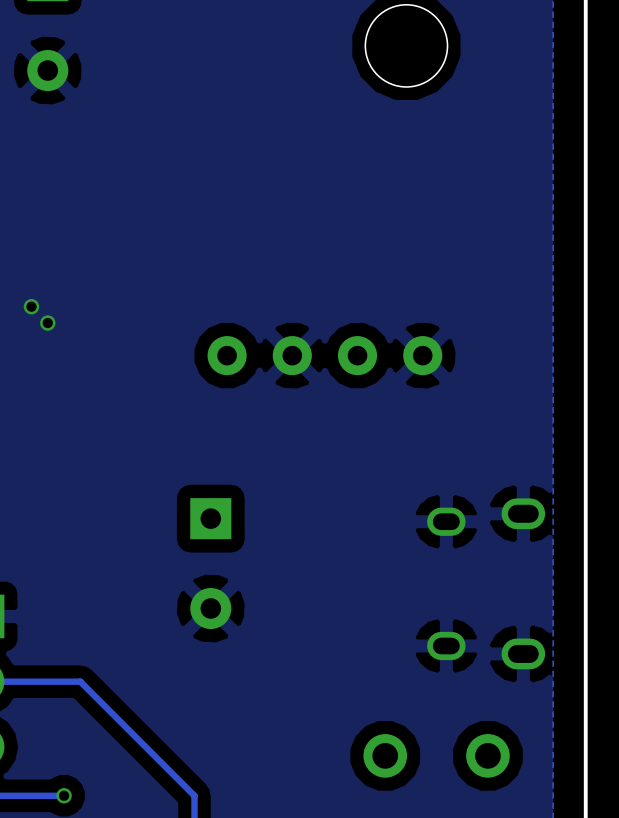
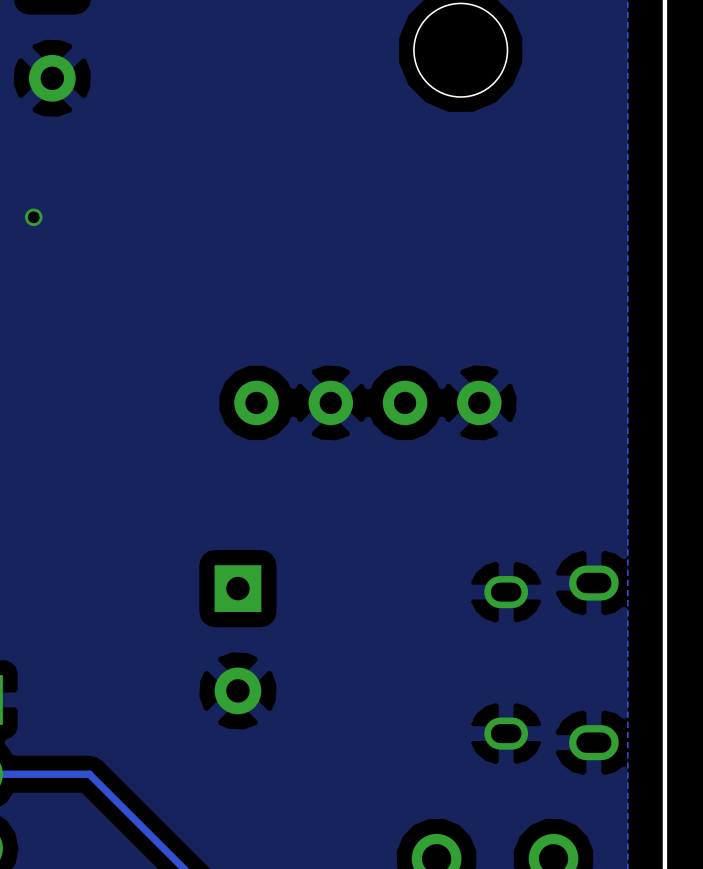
via: none -> (33, 217)
via: (31, 306) -> none
via: (47, 323) -> none

